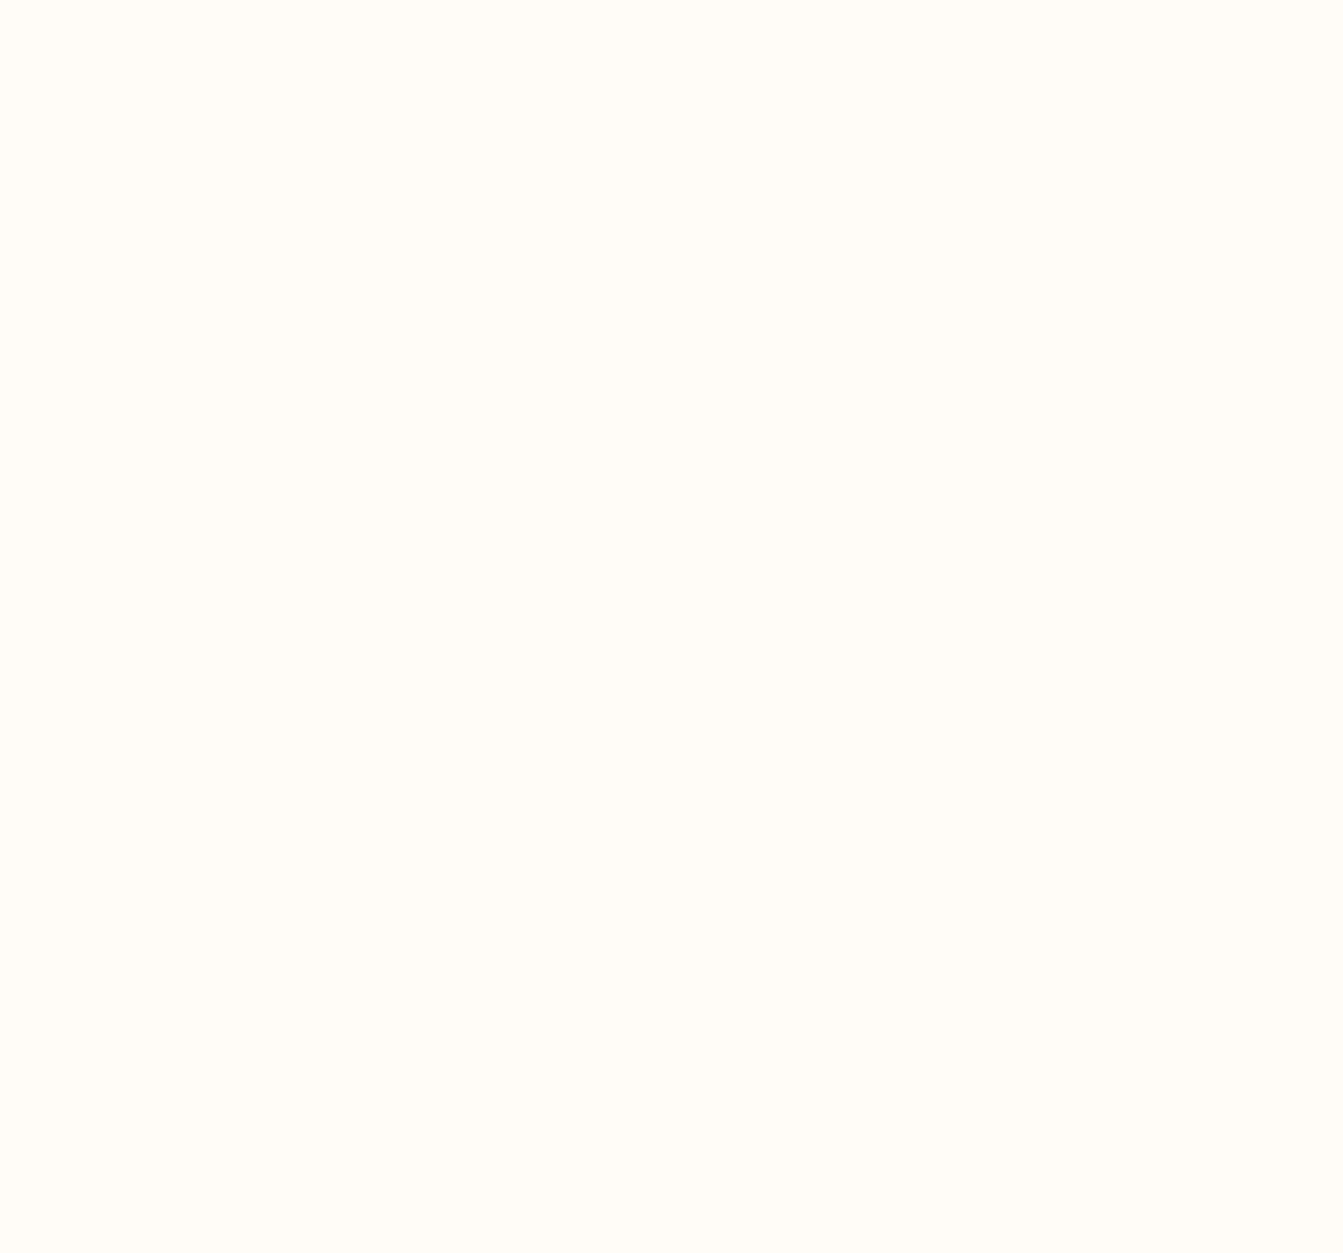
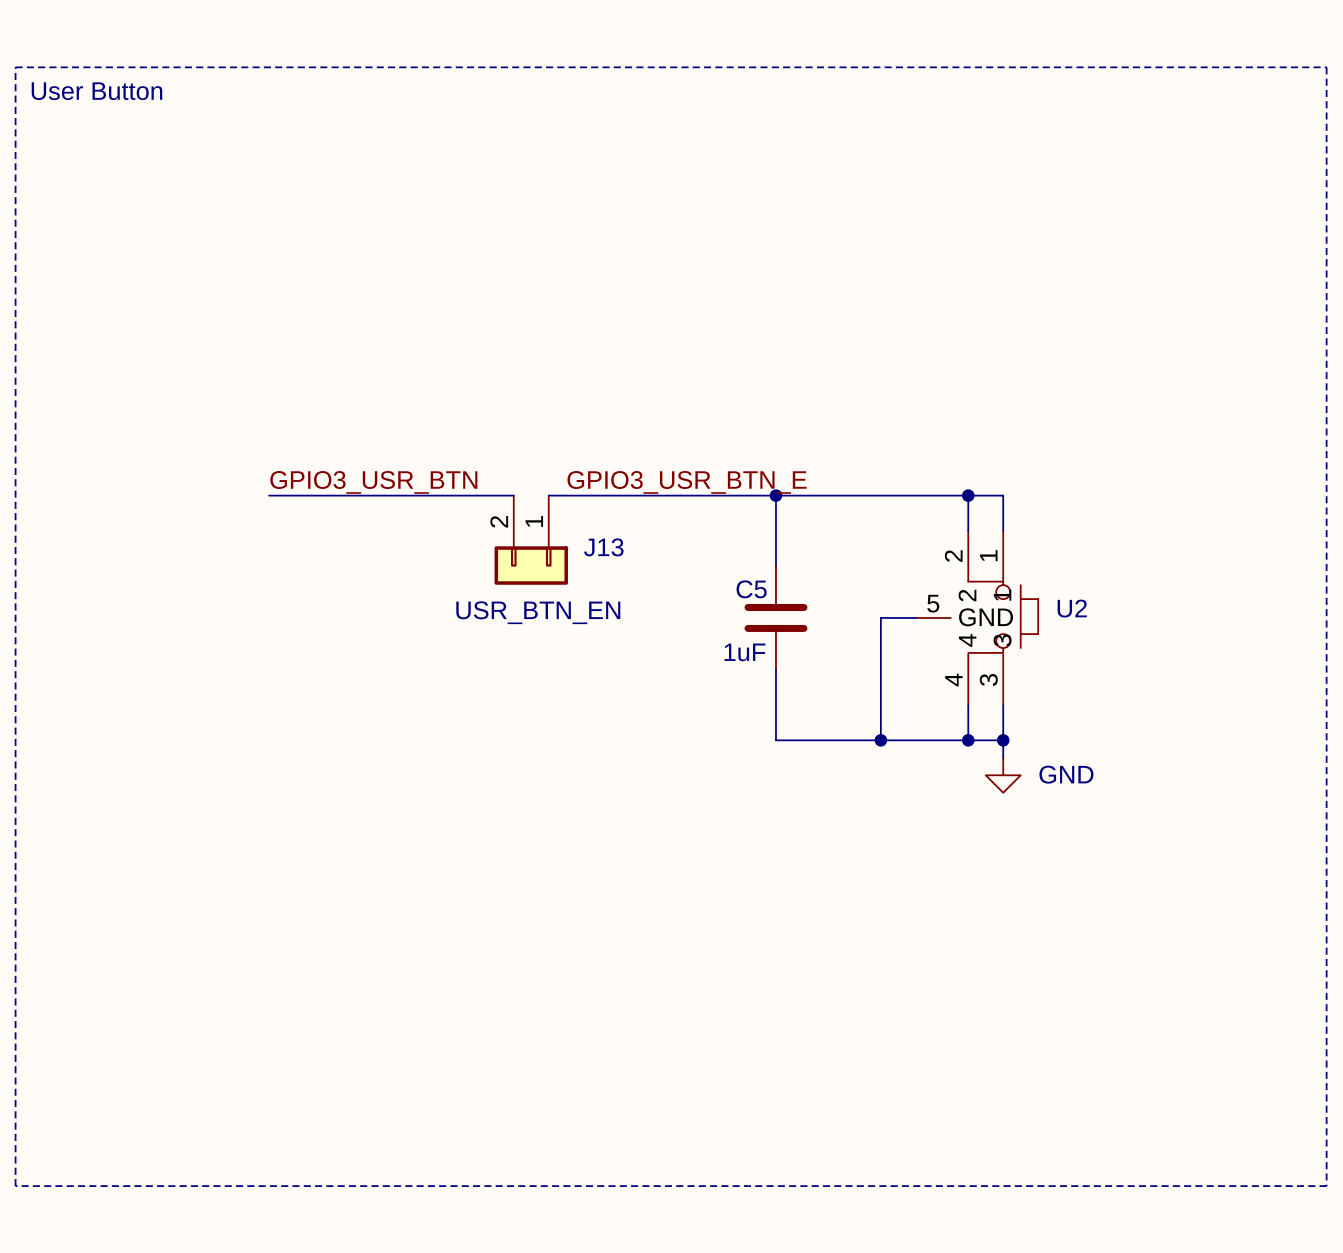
line: none -> (15, 67) (1326, 67) (1326, 1186) (15, 1186) (15, 67)
text: none -> User Button (96, 91)
label: none -> GPIO3_USR_BTN (373, 482)
label: none -> GPIO3_USR_BTN_E (687, 482)
wire: none -> (269, 495) (513, 495)
wire: none -> (548, 495) (1003, 495) (1003, 530)
wire: none -> (775, 495) (775, 565)
junction: none -> (775, 495)
wire: none -> (968, 495) (968, 530)
junction: none -> (968, 495)
J13: none -> USR_BTN_EN (531, 540)
C5: none -> 1uF (775, 617)
wire: none -> (915, 617) (880, 617) (880, 740)
U2: none -> (977, 617)
wire: none -> (775, 670) (775, 740) (1003, 740)
wire: none -> (968, 705) (968, 740)
wire: none -> (1003, 705) (1003, 757)
junction: none -> (880, 740)
junction: none -> (968, 740)
junction: none -> (1003, 740)
power symbol: none -> GND (1003, 775)

